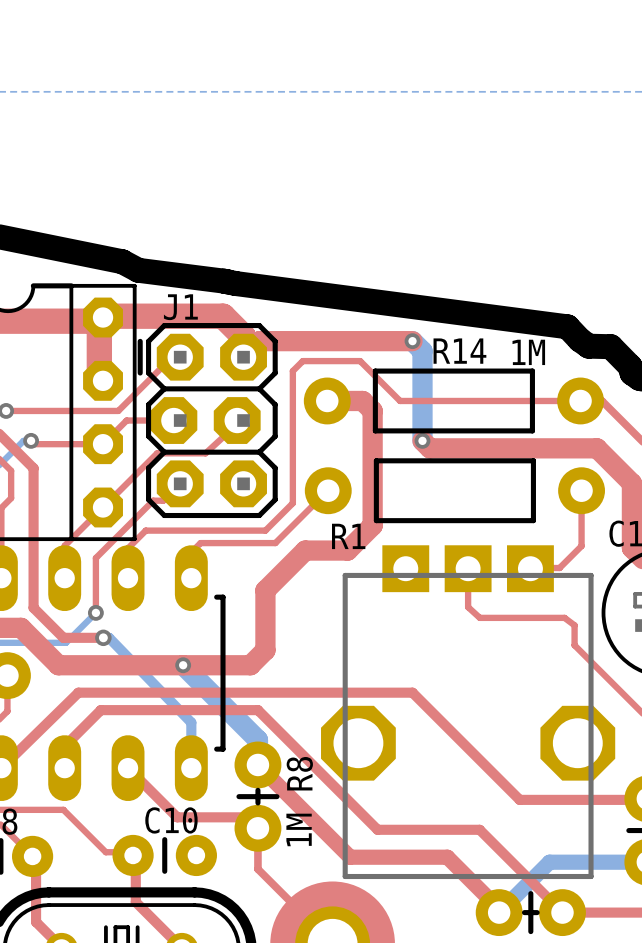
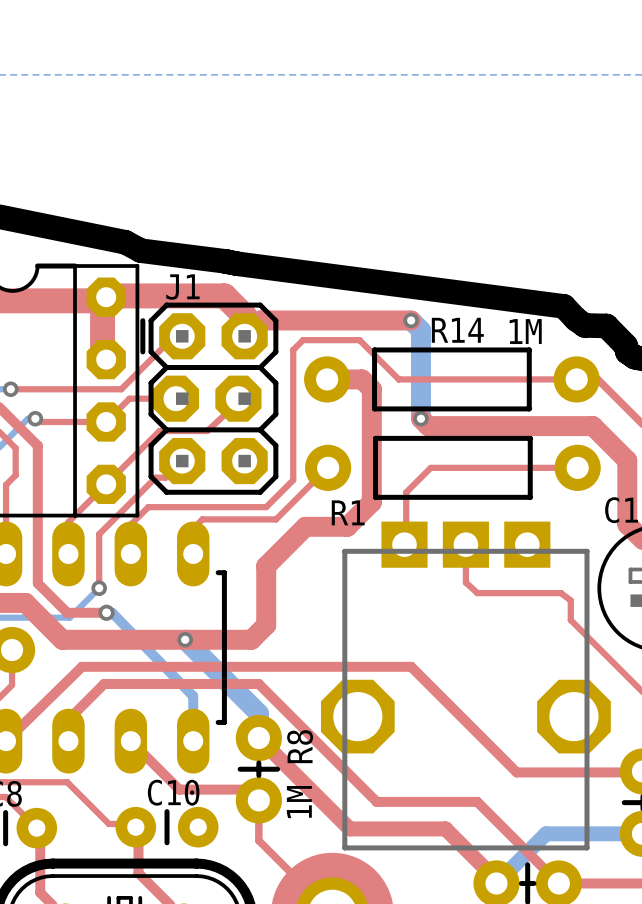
top track: (581, 490) (581, 546) (559, 568) (530, 568) -> (577, 467) (430, 467) (406, 492) (406, 542) (404, 544)

